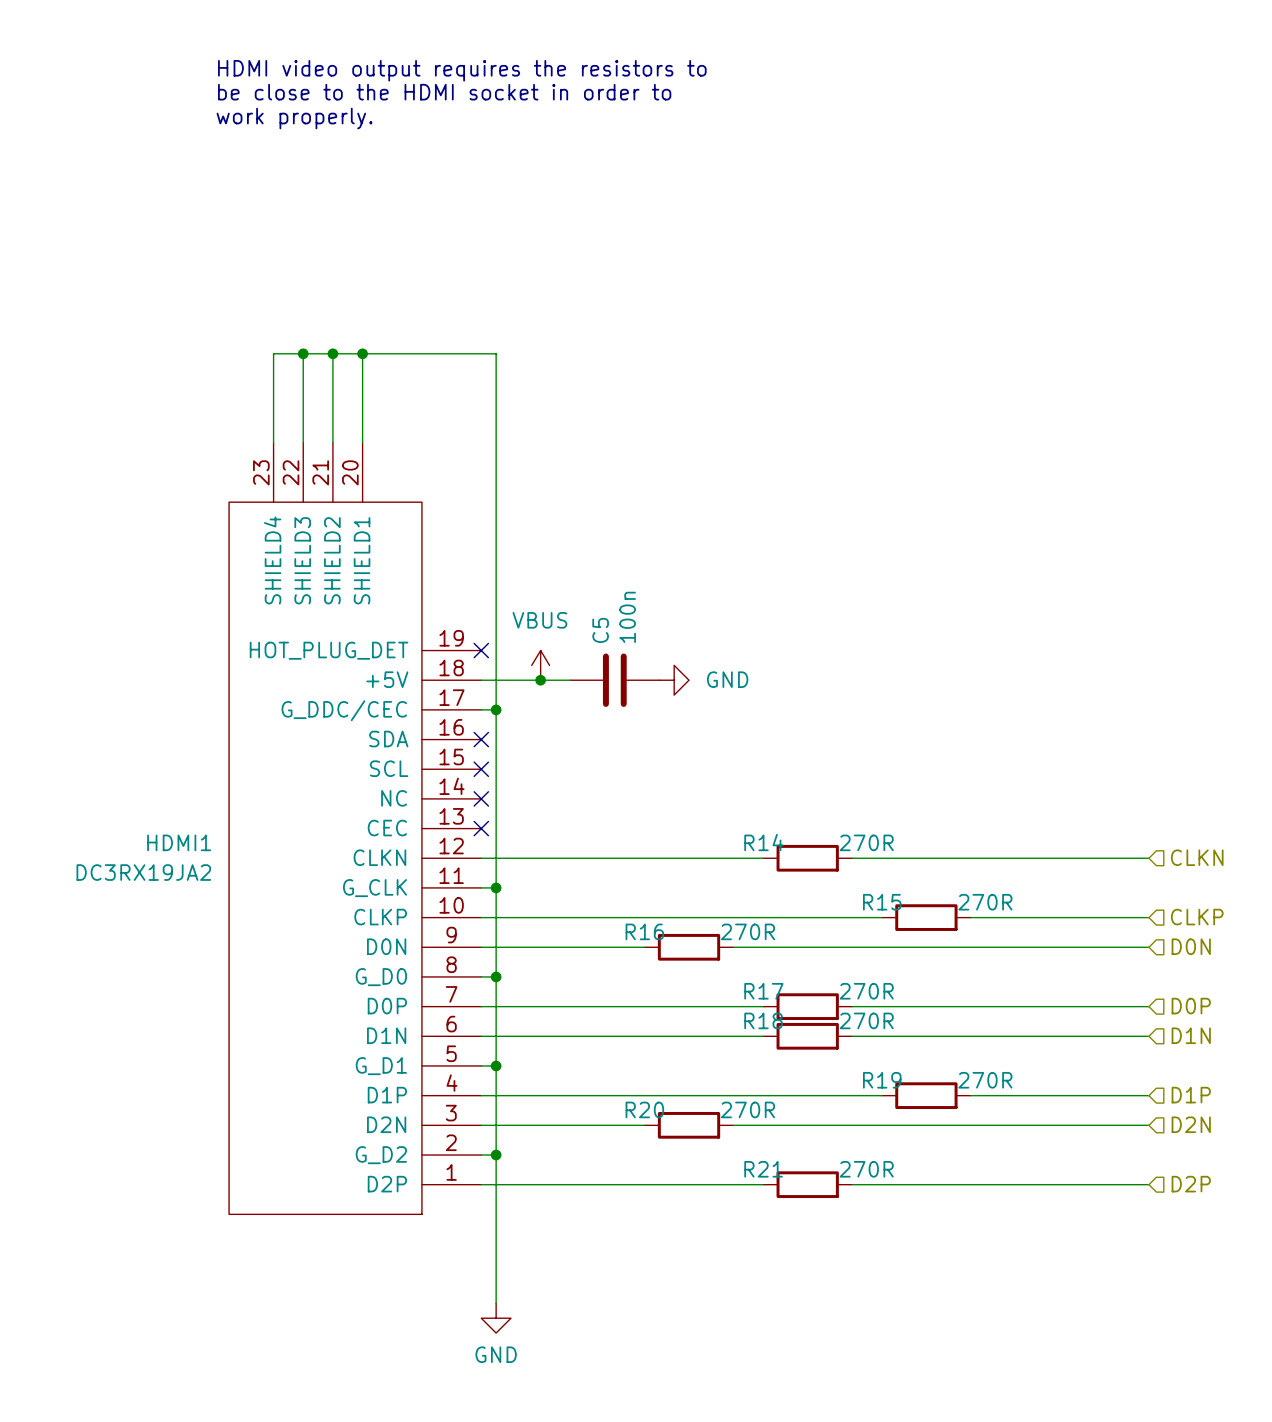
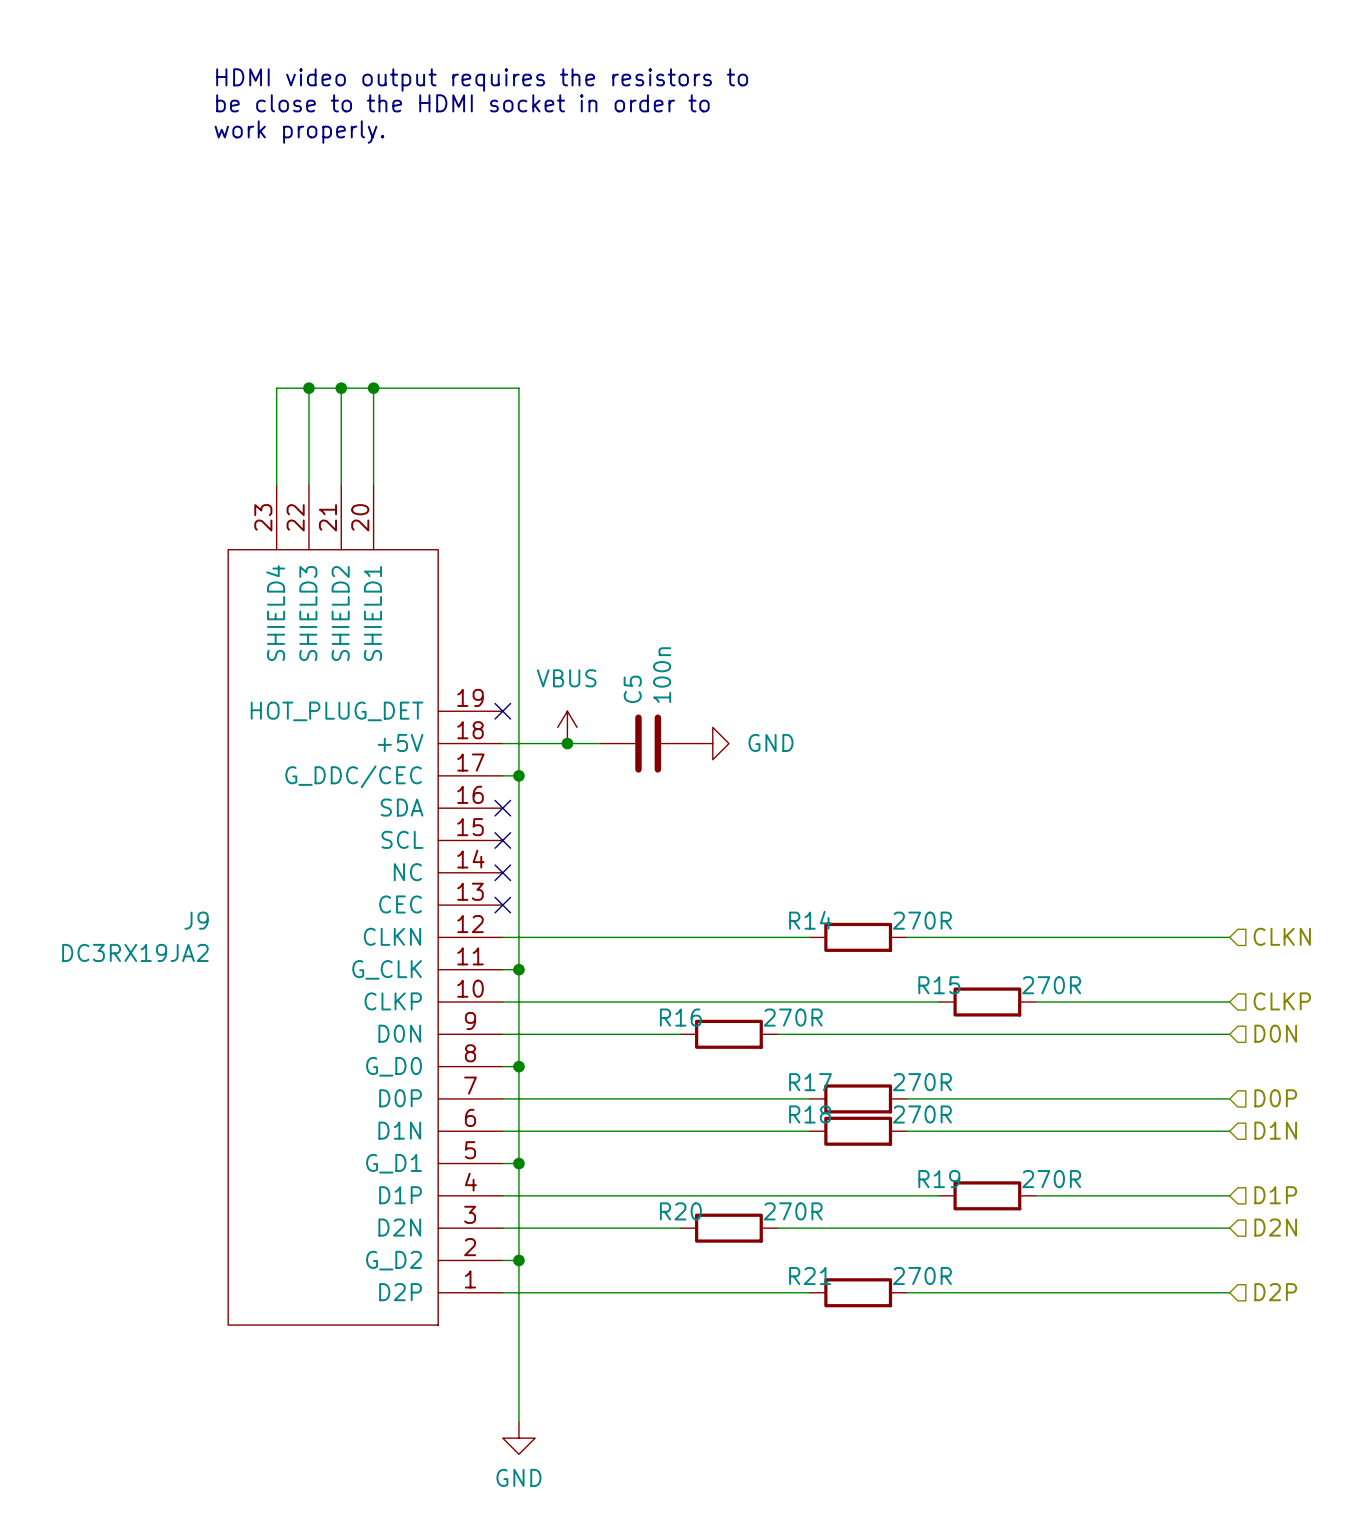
HDMI1 name: HDMI1 (179, 842) -> J9 (196, 920)

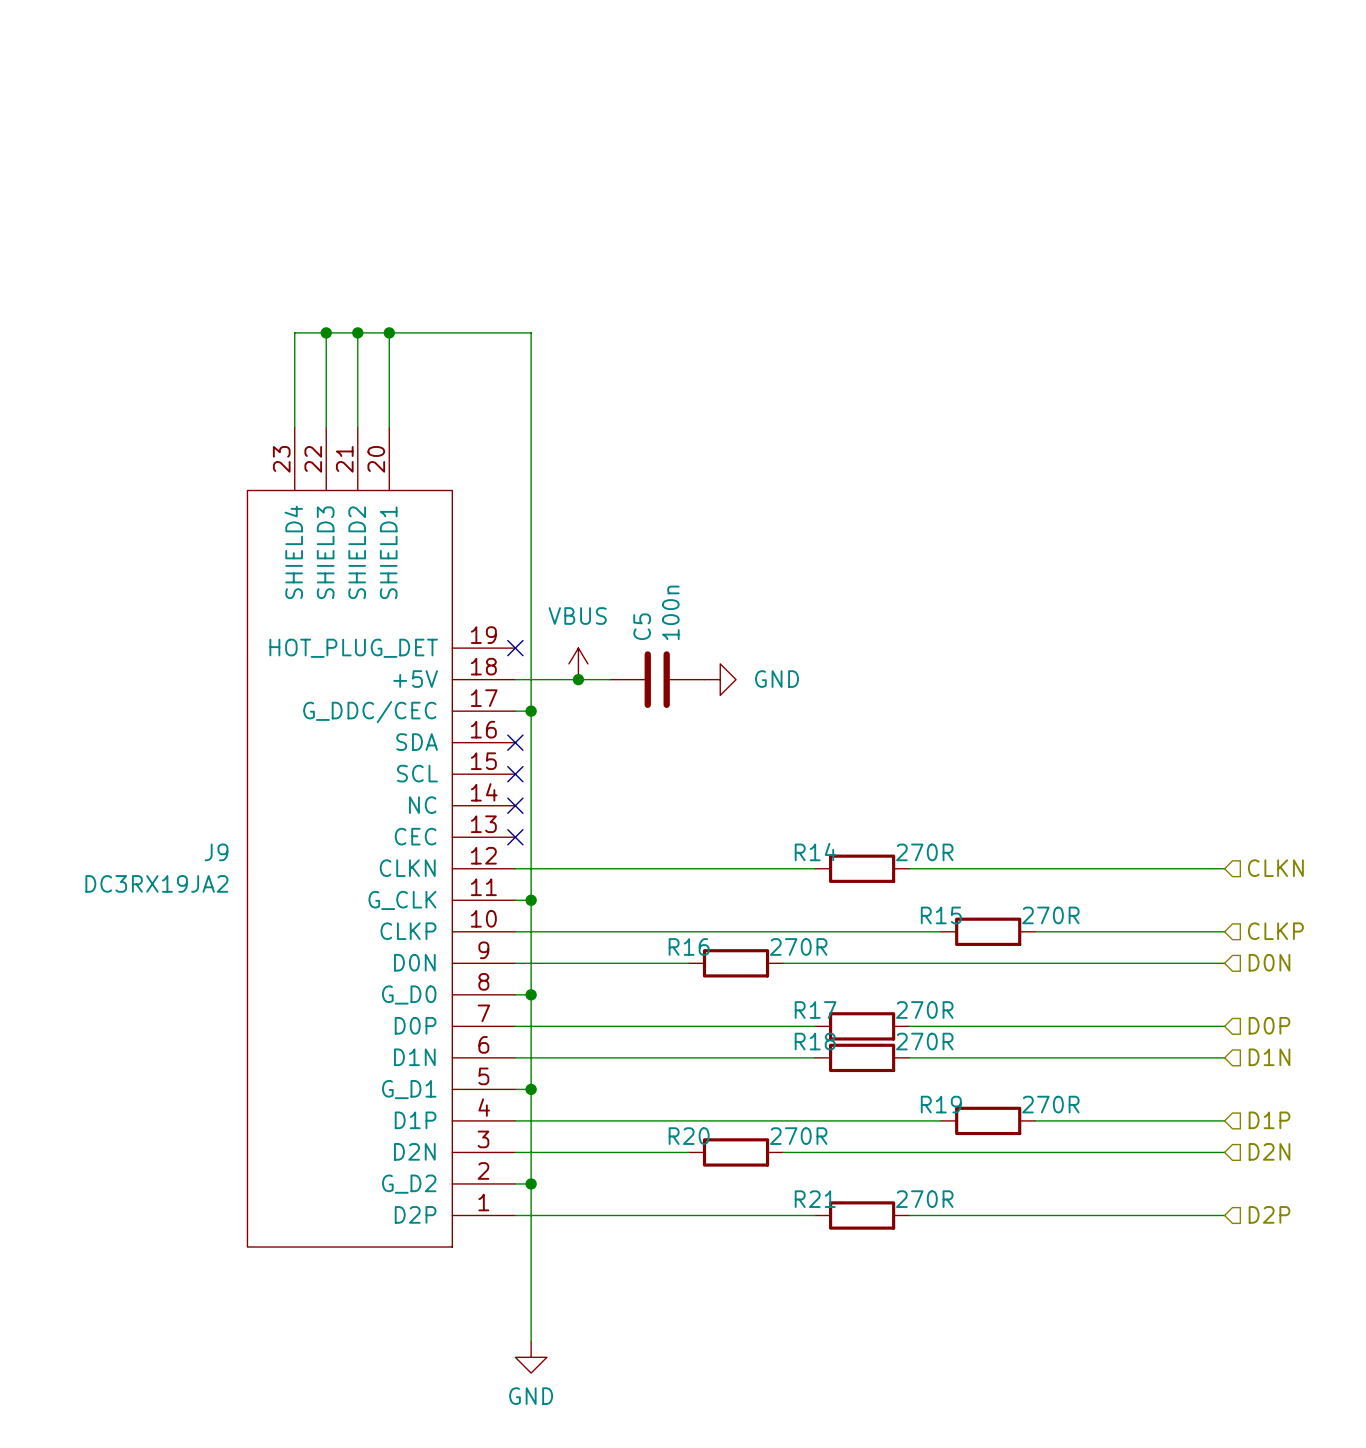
text: HDMI video output requires the resistors to (482, 80) -> none
text: be close to the HDMI socket in order to (462, 103) -> none
text: work properly. (299, 132) -> none

